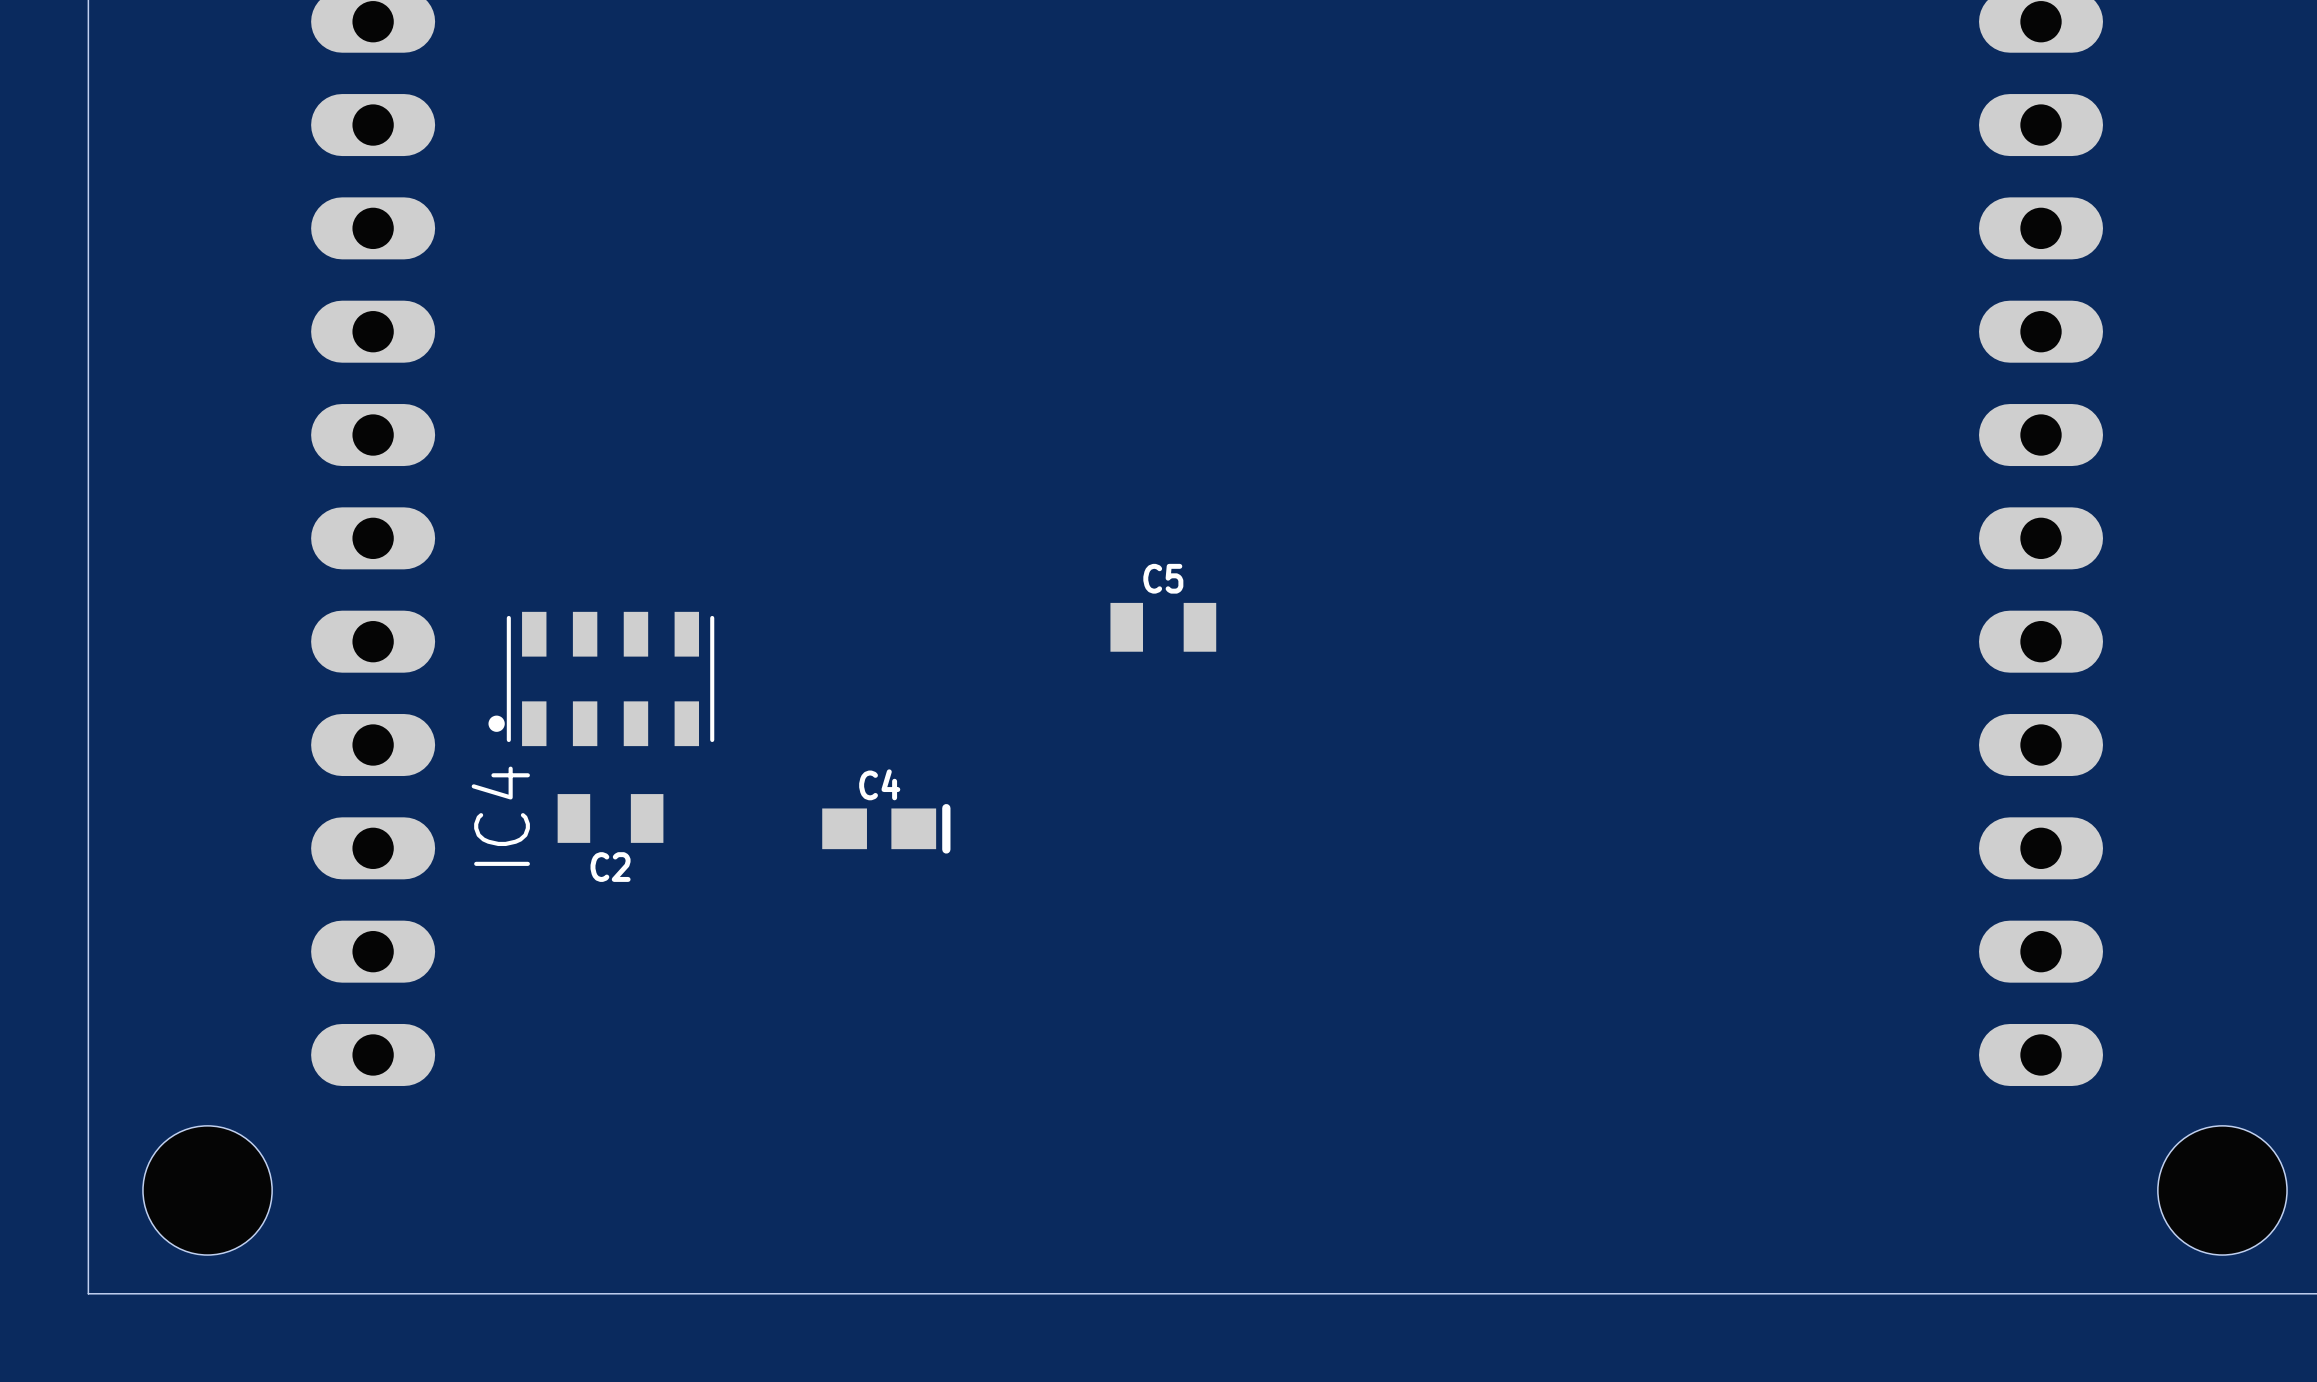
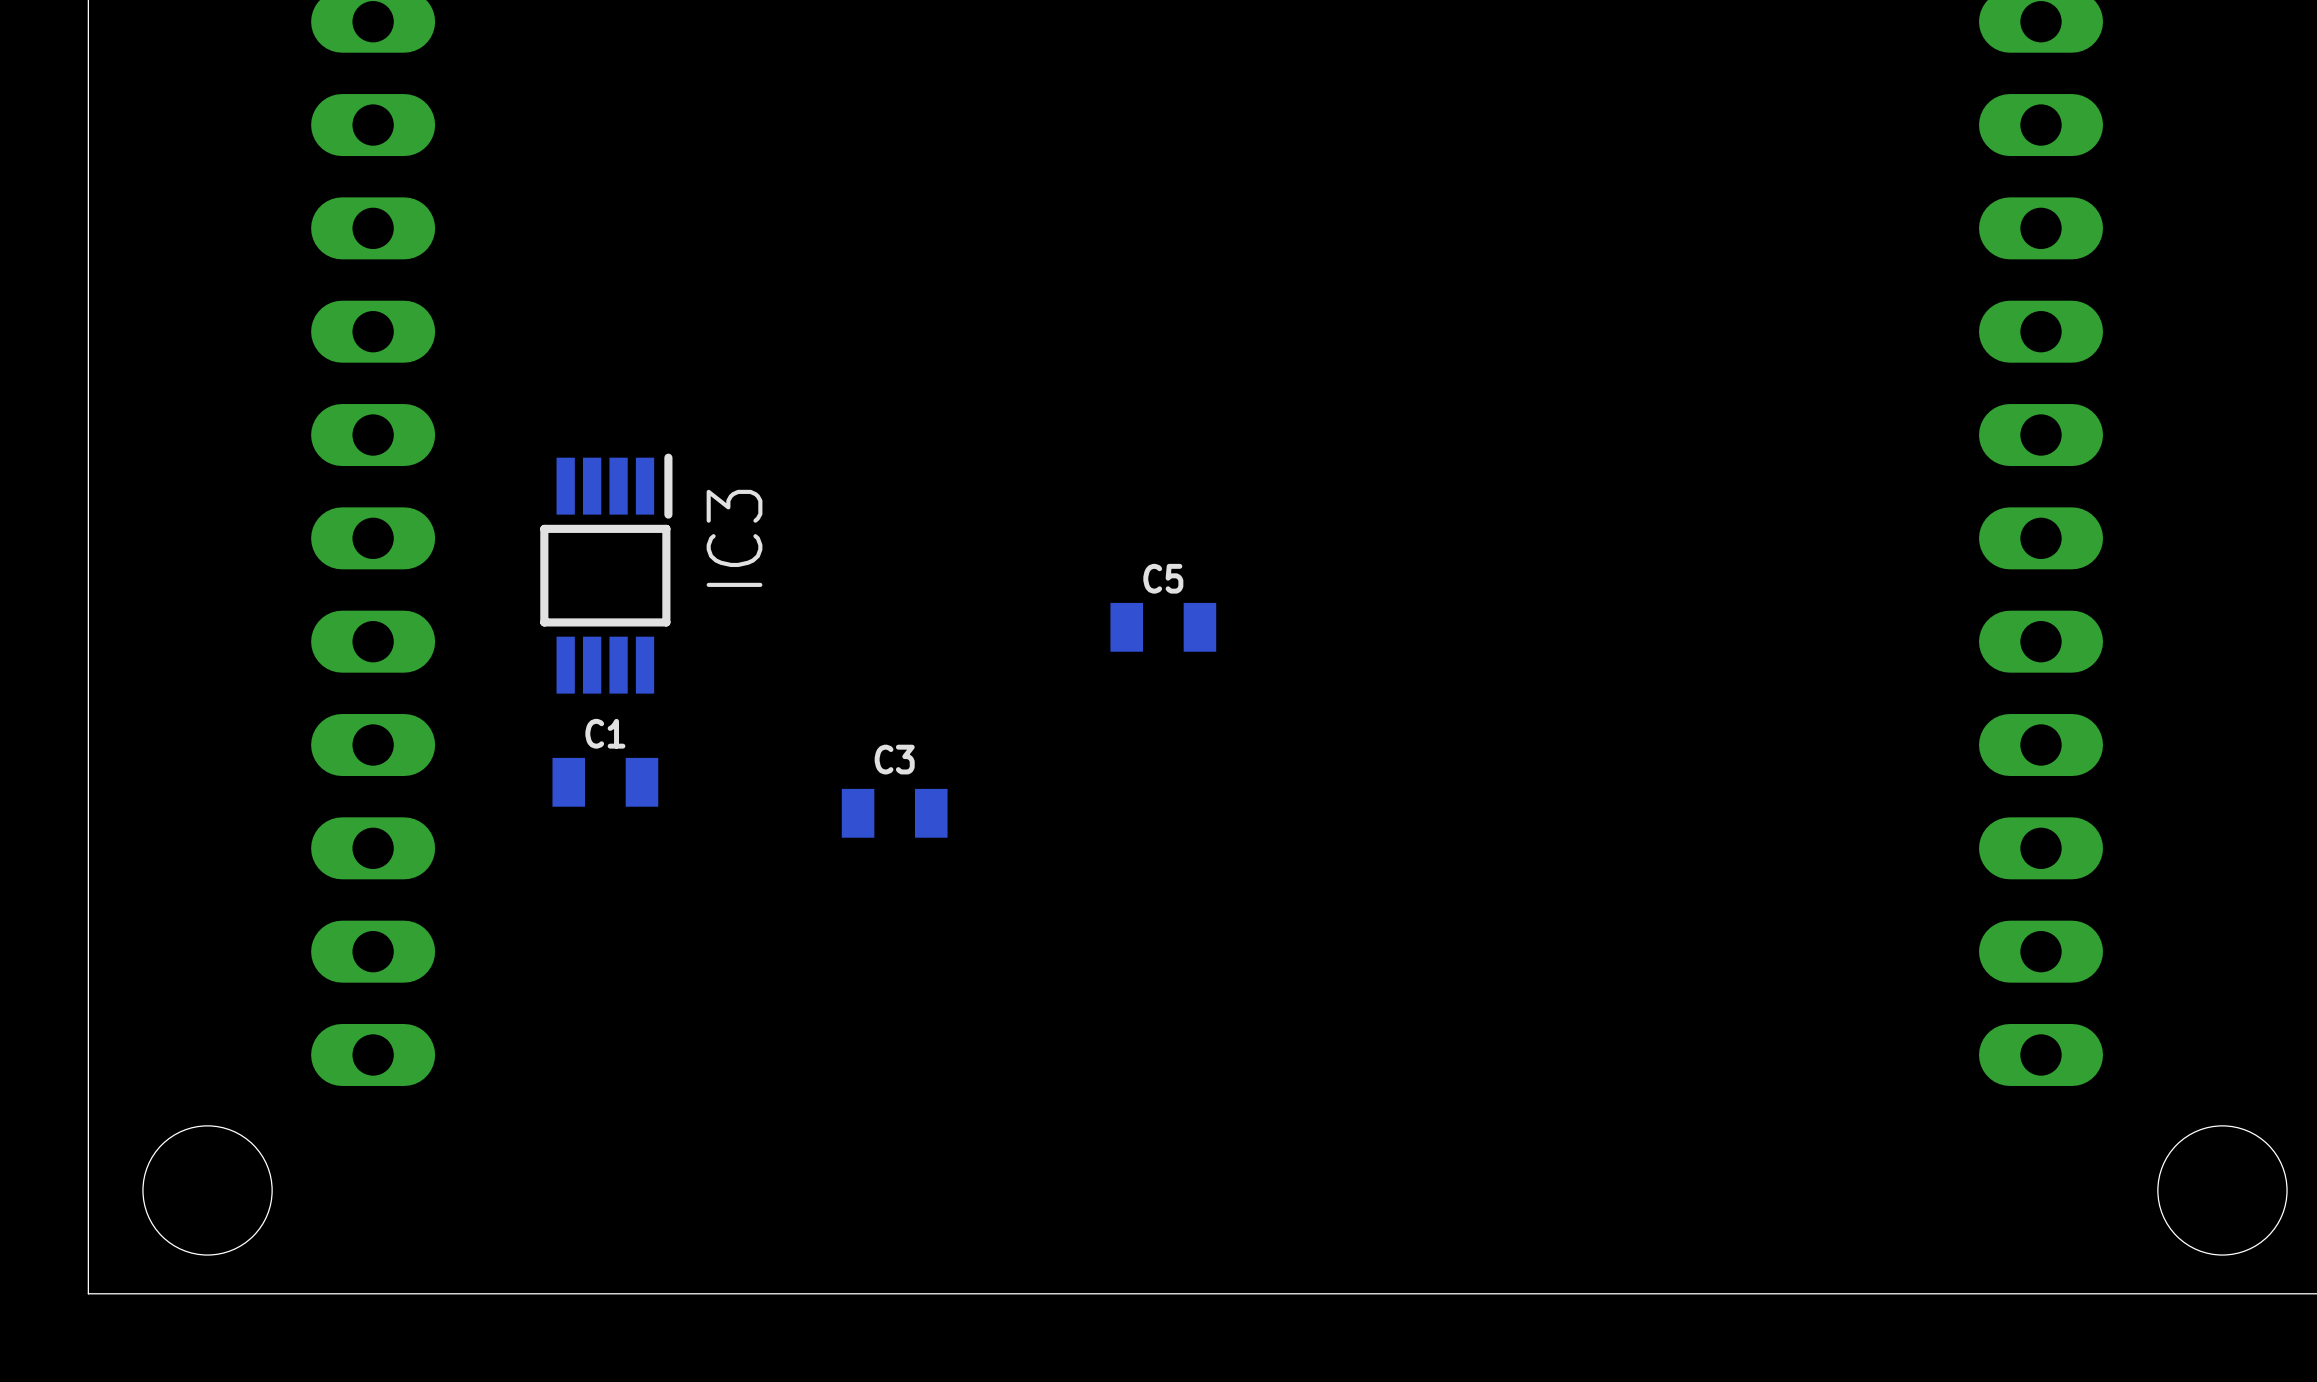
IC3: none -> (606, 573)
IC4: (601, 678) -> none
C3: none -> (894, 813)
C2 position: (610, 818) -> (605, 782)
C4: (886, 828) -> none
C2 name: C2 (610, 867) -> C1 (605, 733)

